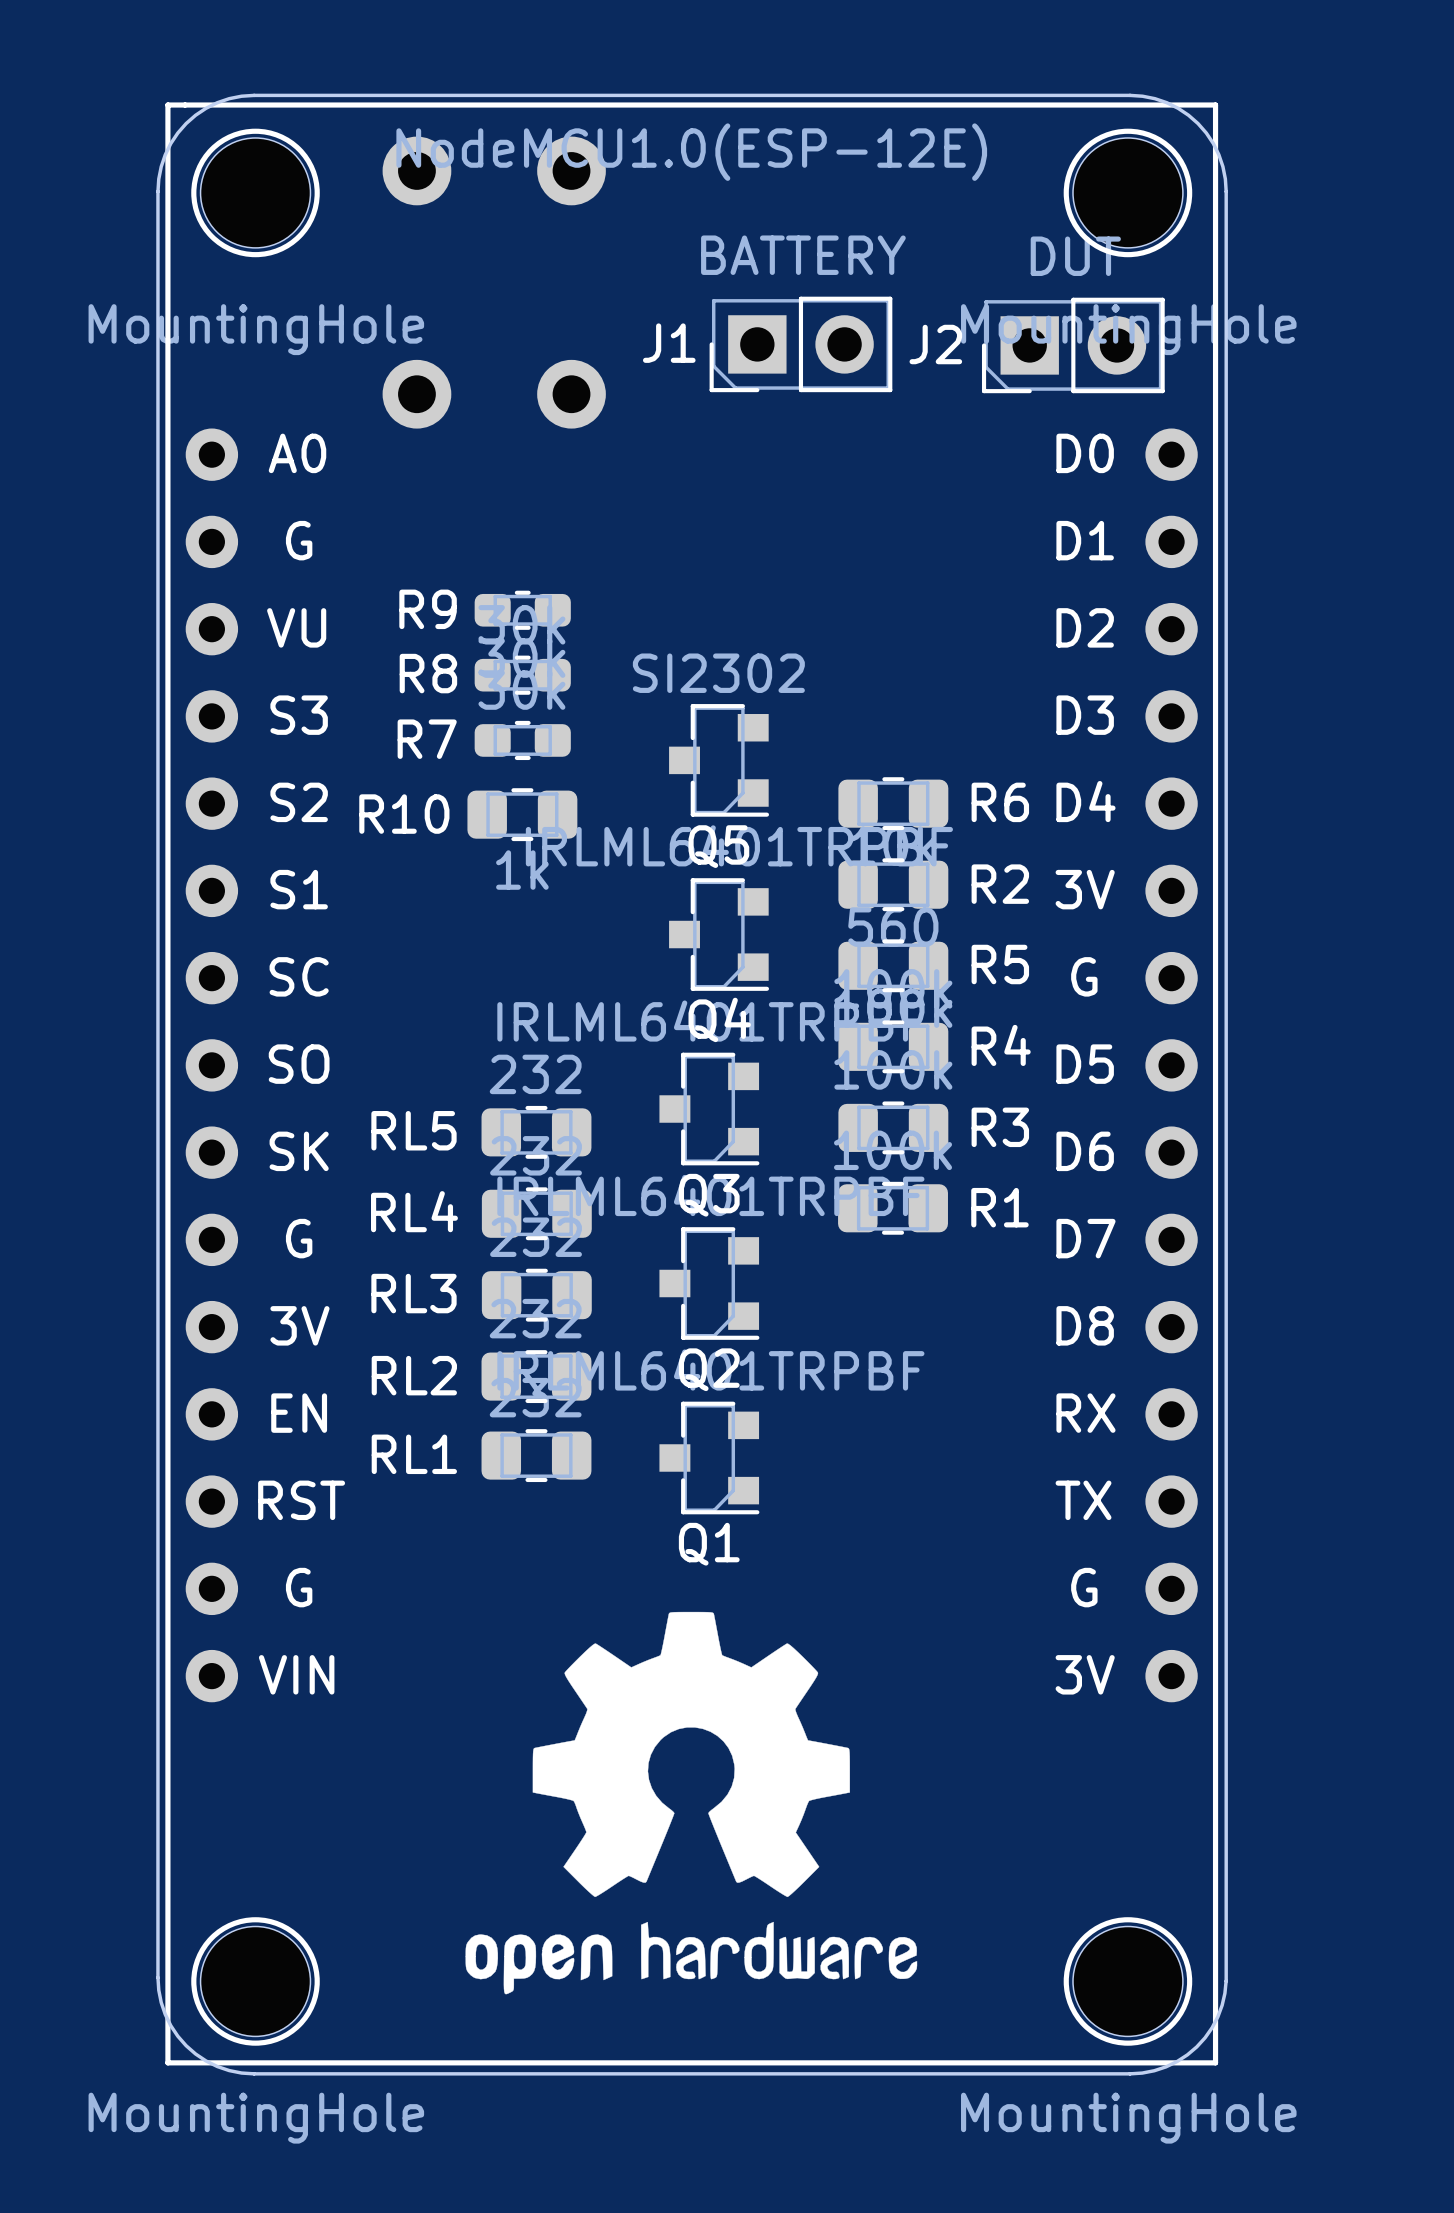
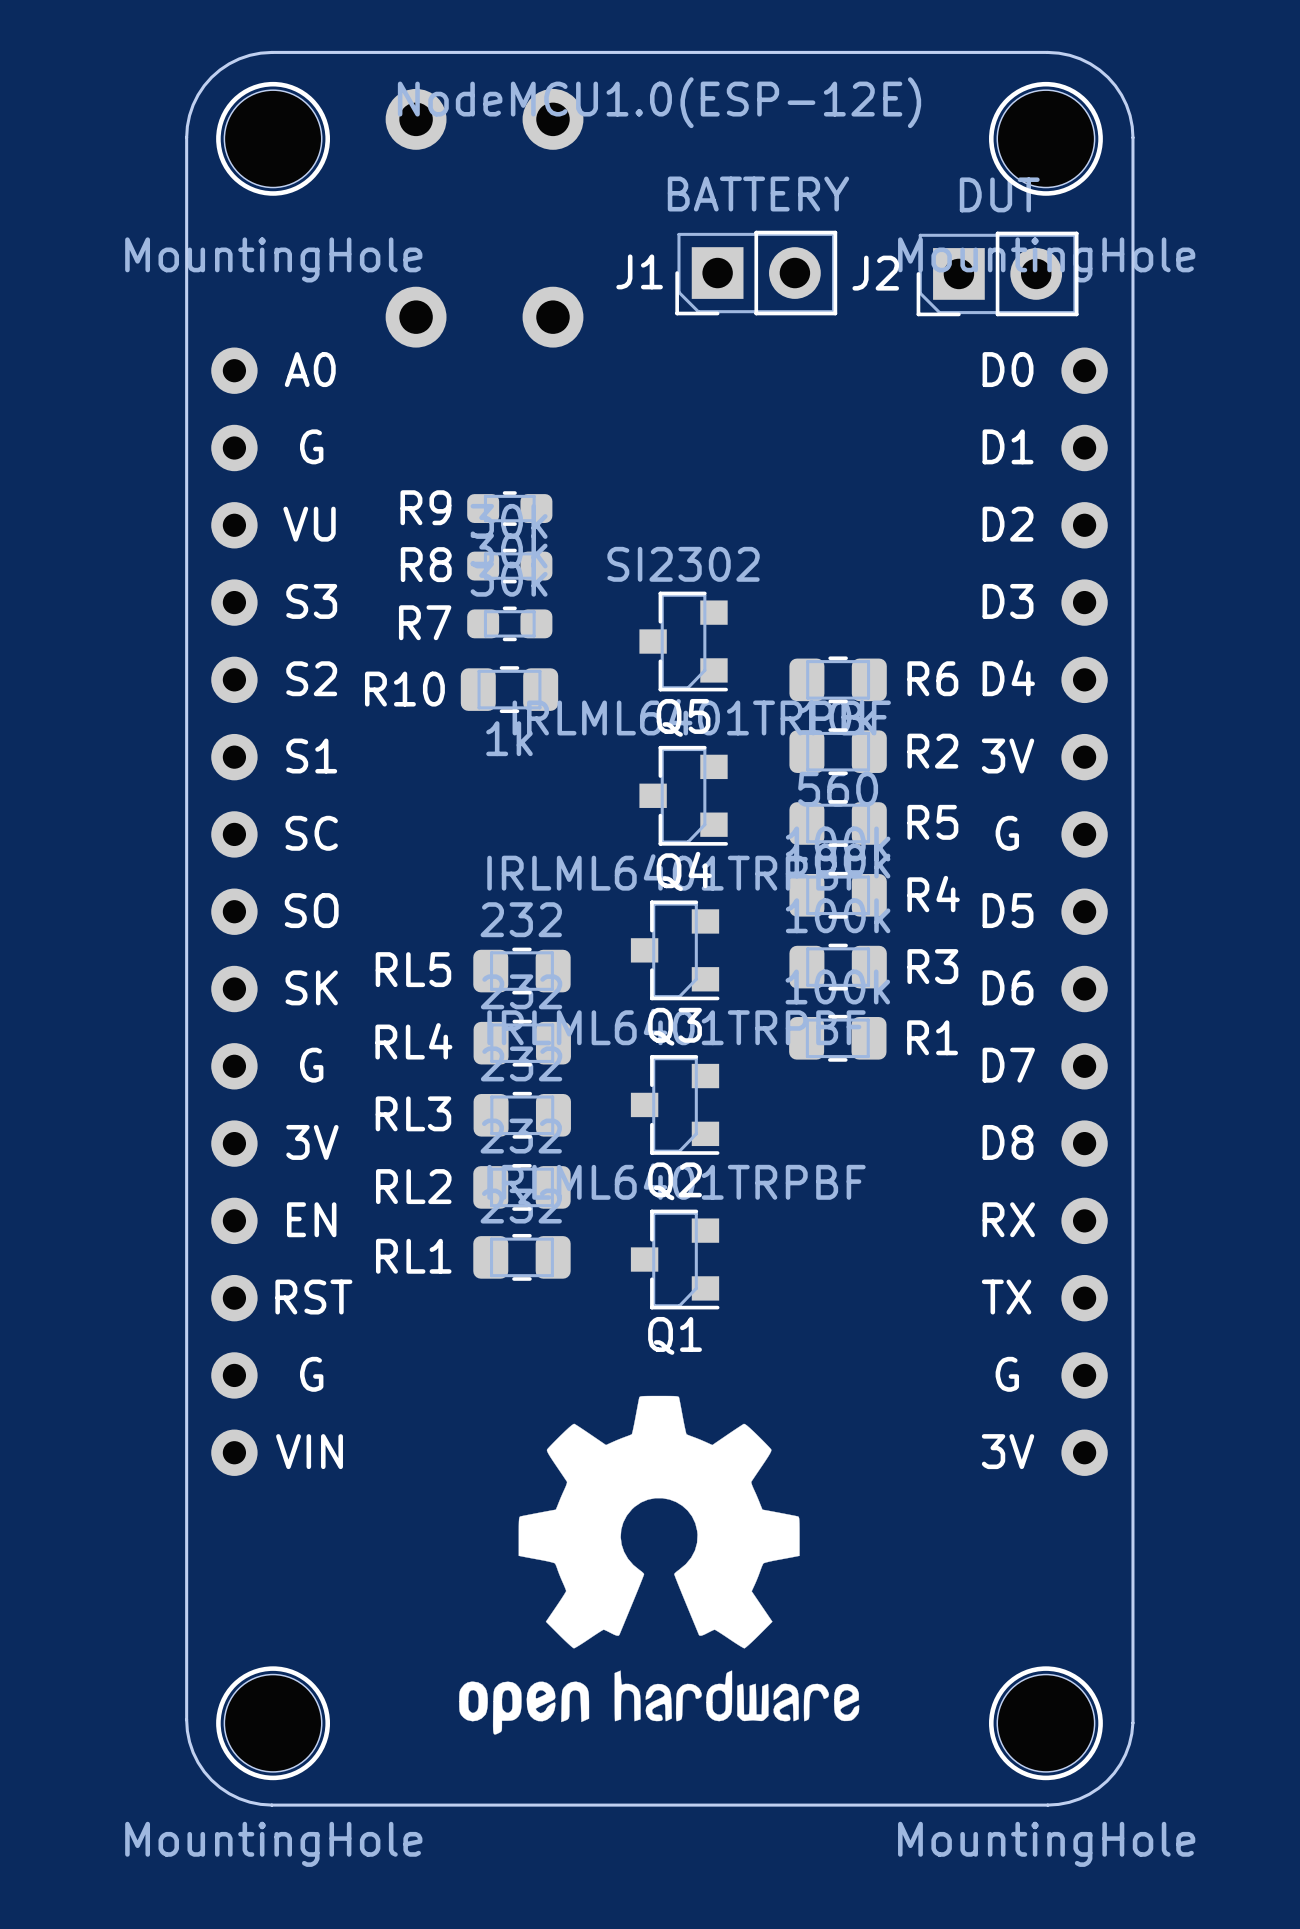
part footprint: [165, 102, 1219, 2066] -> [211, 81, 1108, 1781]

